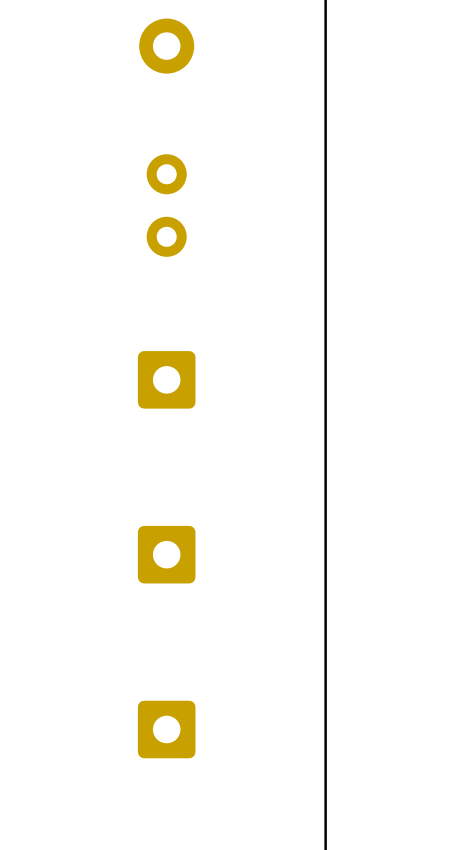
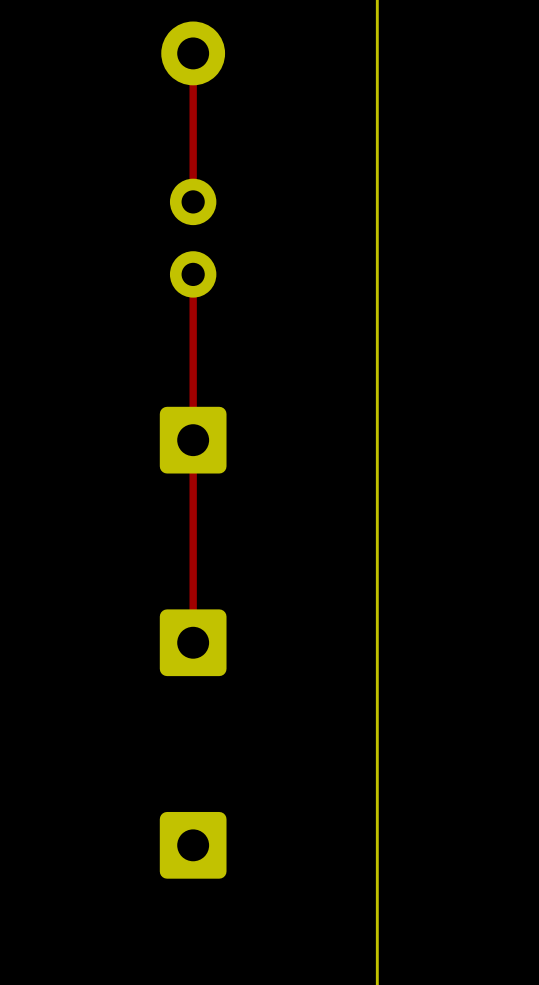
top track: none -> (193, 53) (193, 201)
top track: none -> (193, 274) (193, 642)

